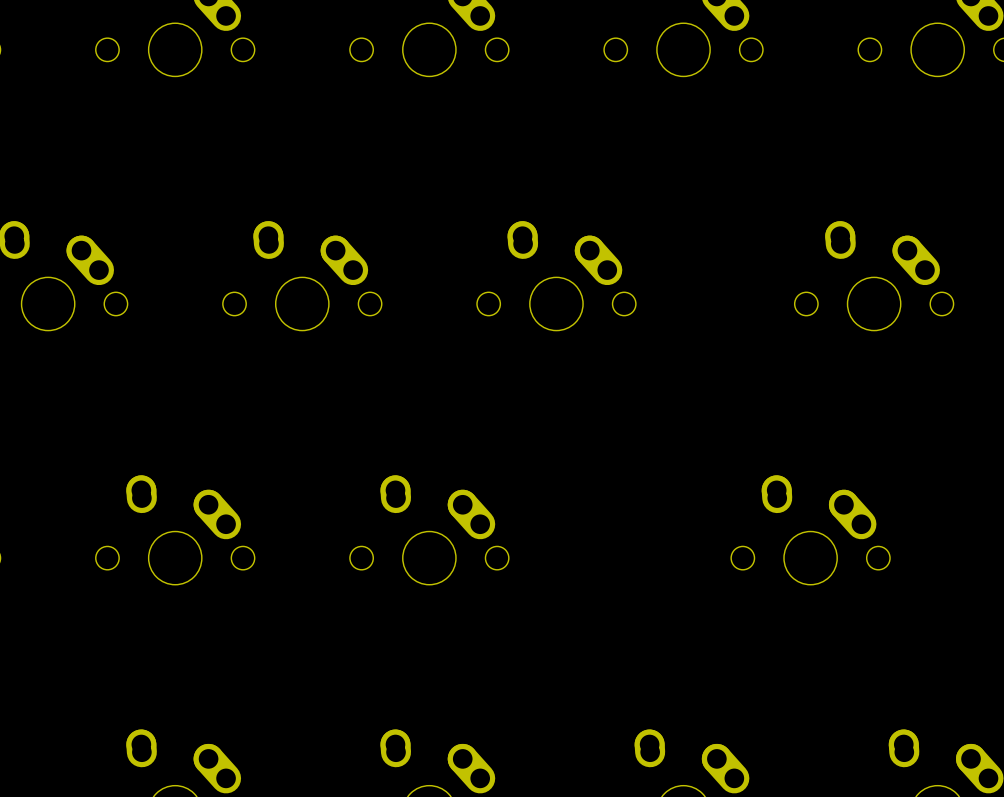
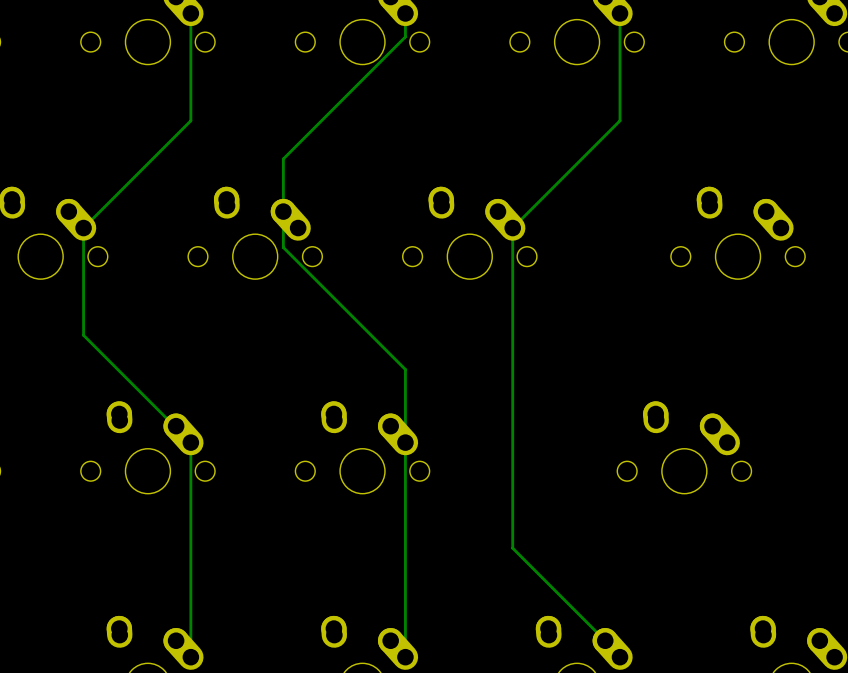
track: none -> (190, 13) (190, 120) (83, 228) (83, 335) (190, 442) (190, 657)
track: none -> (405, 13) (405, 36) (283, 158) (283, 247) (405, 369) (405, 657)
track: none -> (620, 13) (620, 120) (512, 228) (512, 548) (605, 640)

